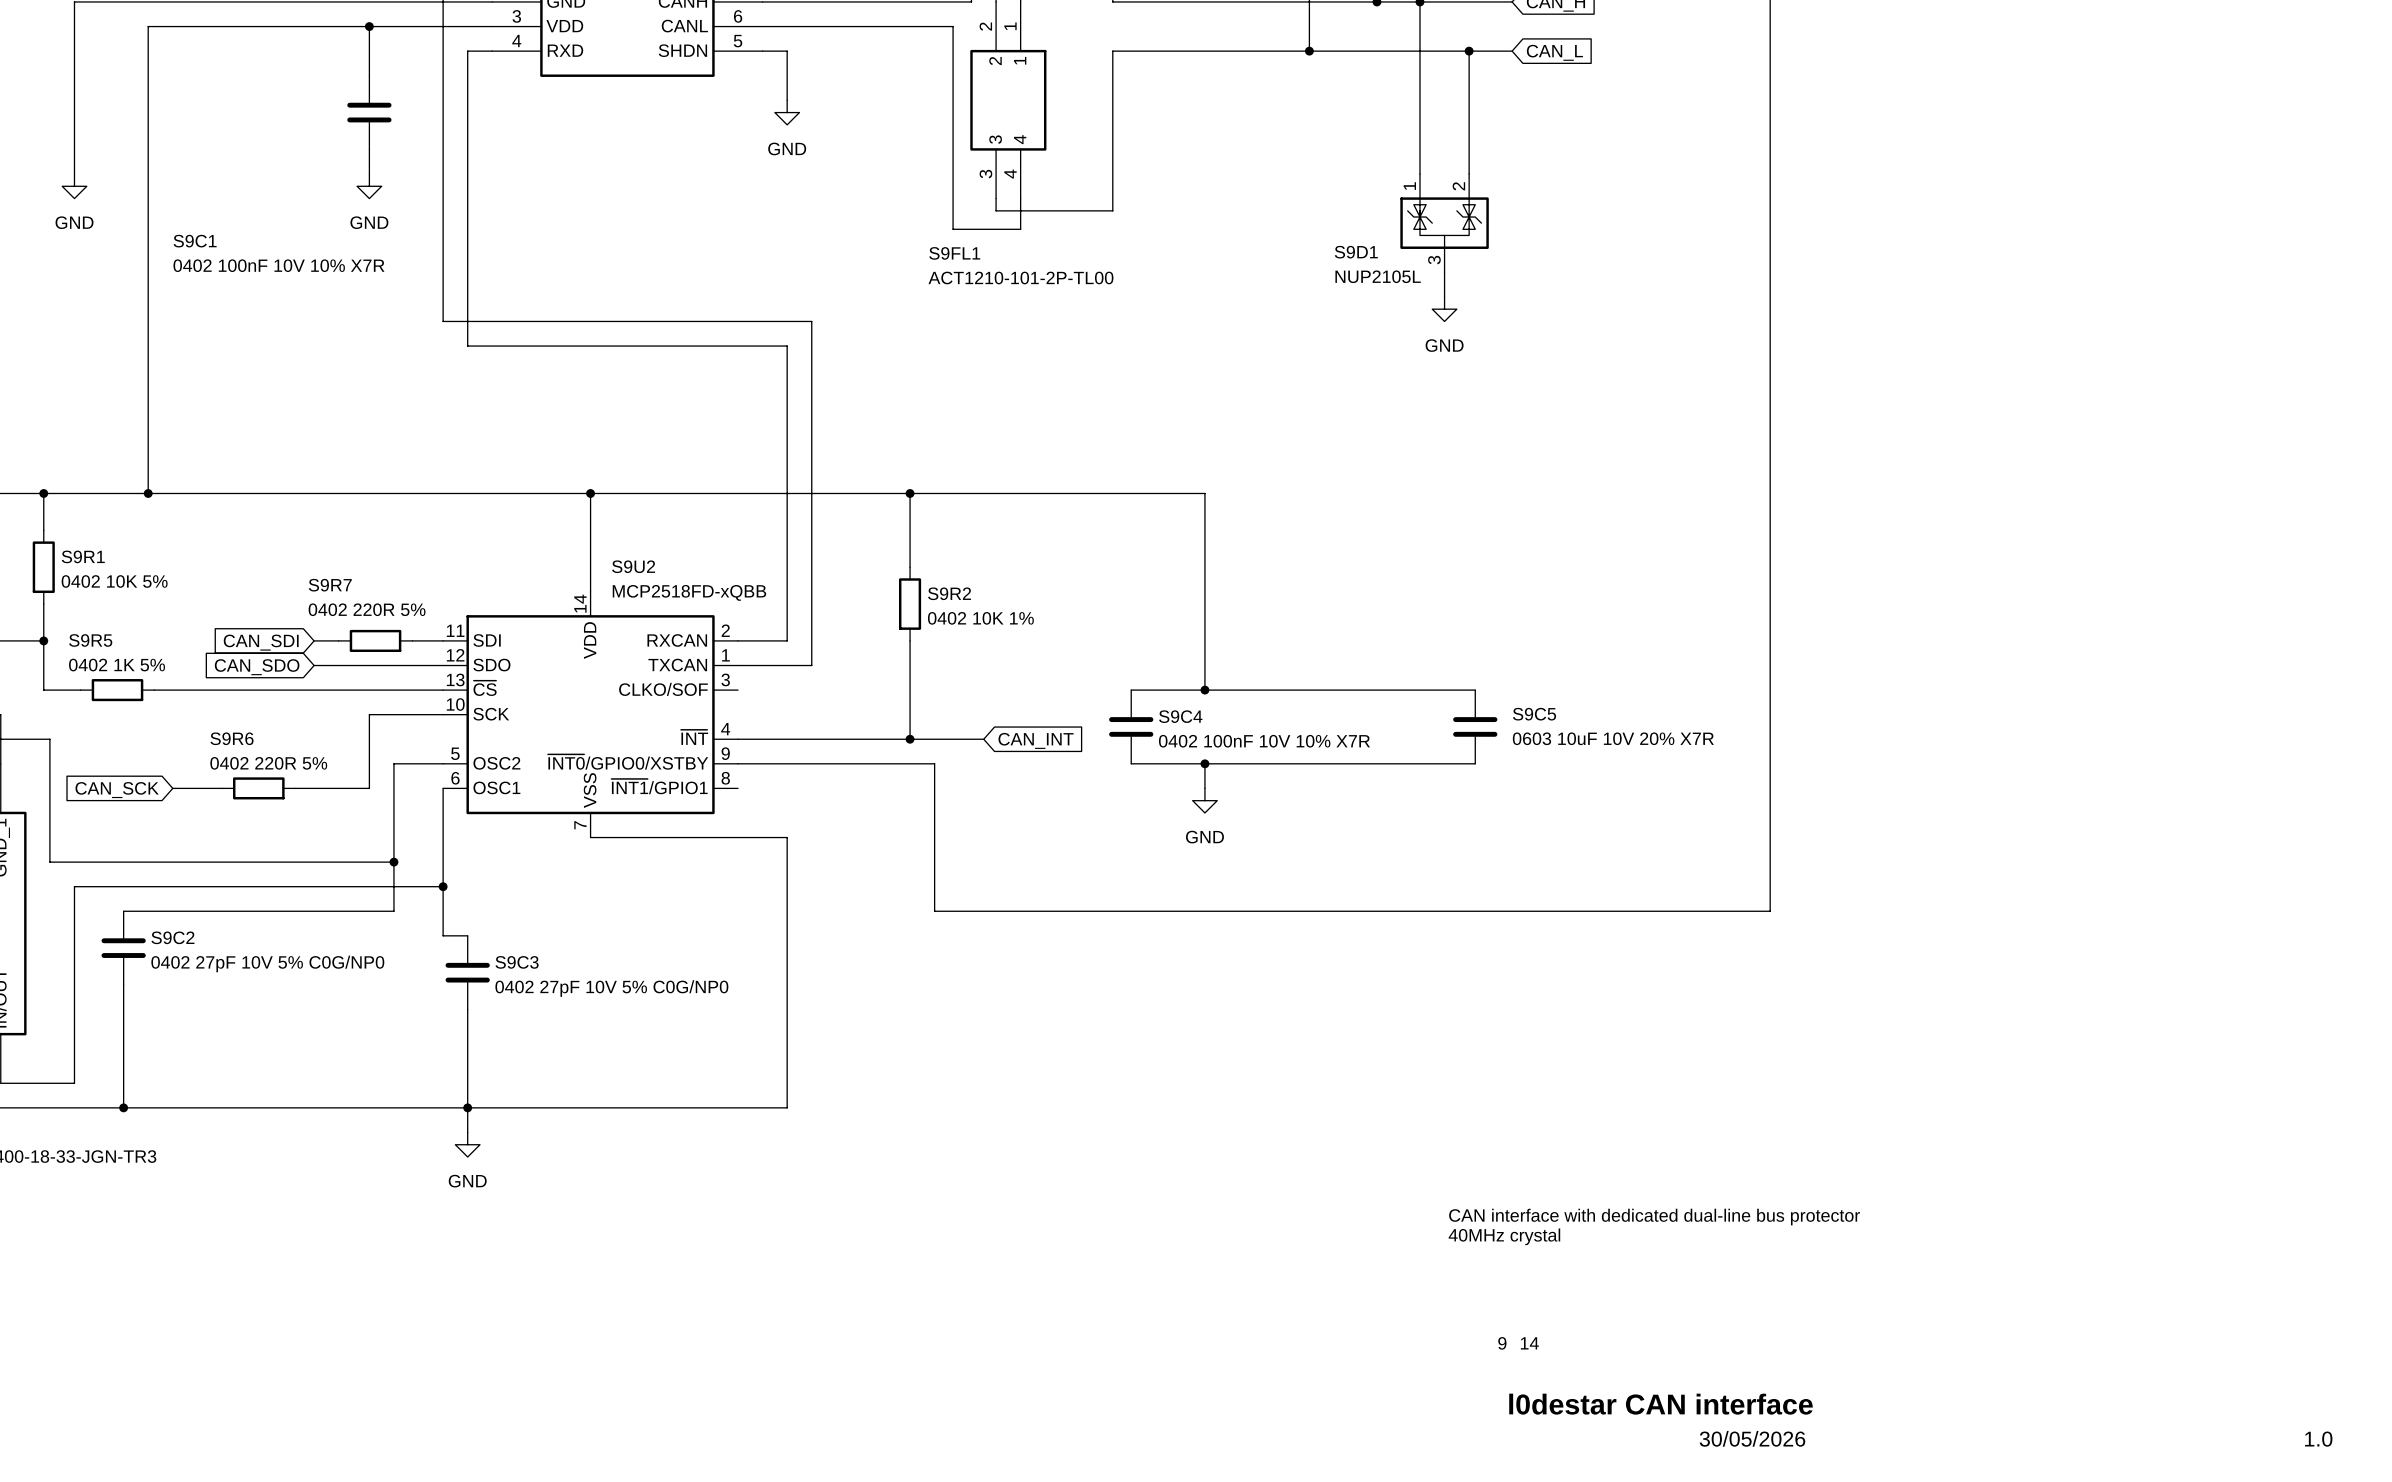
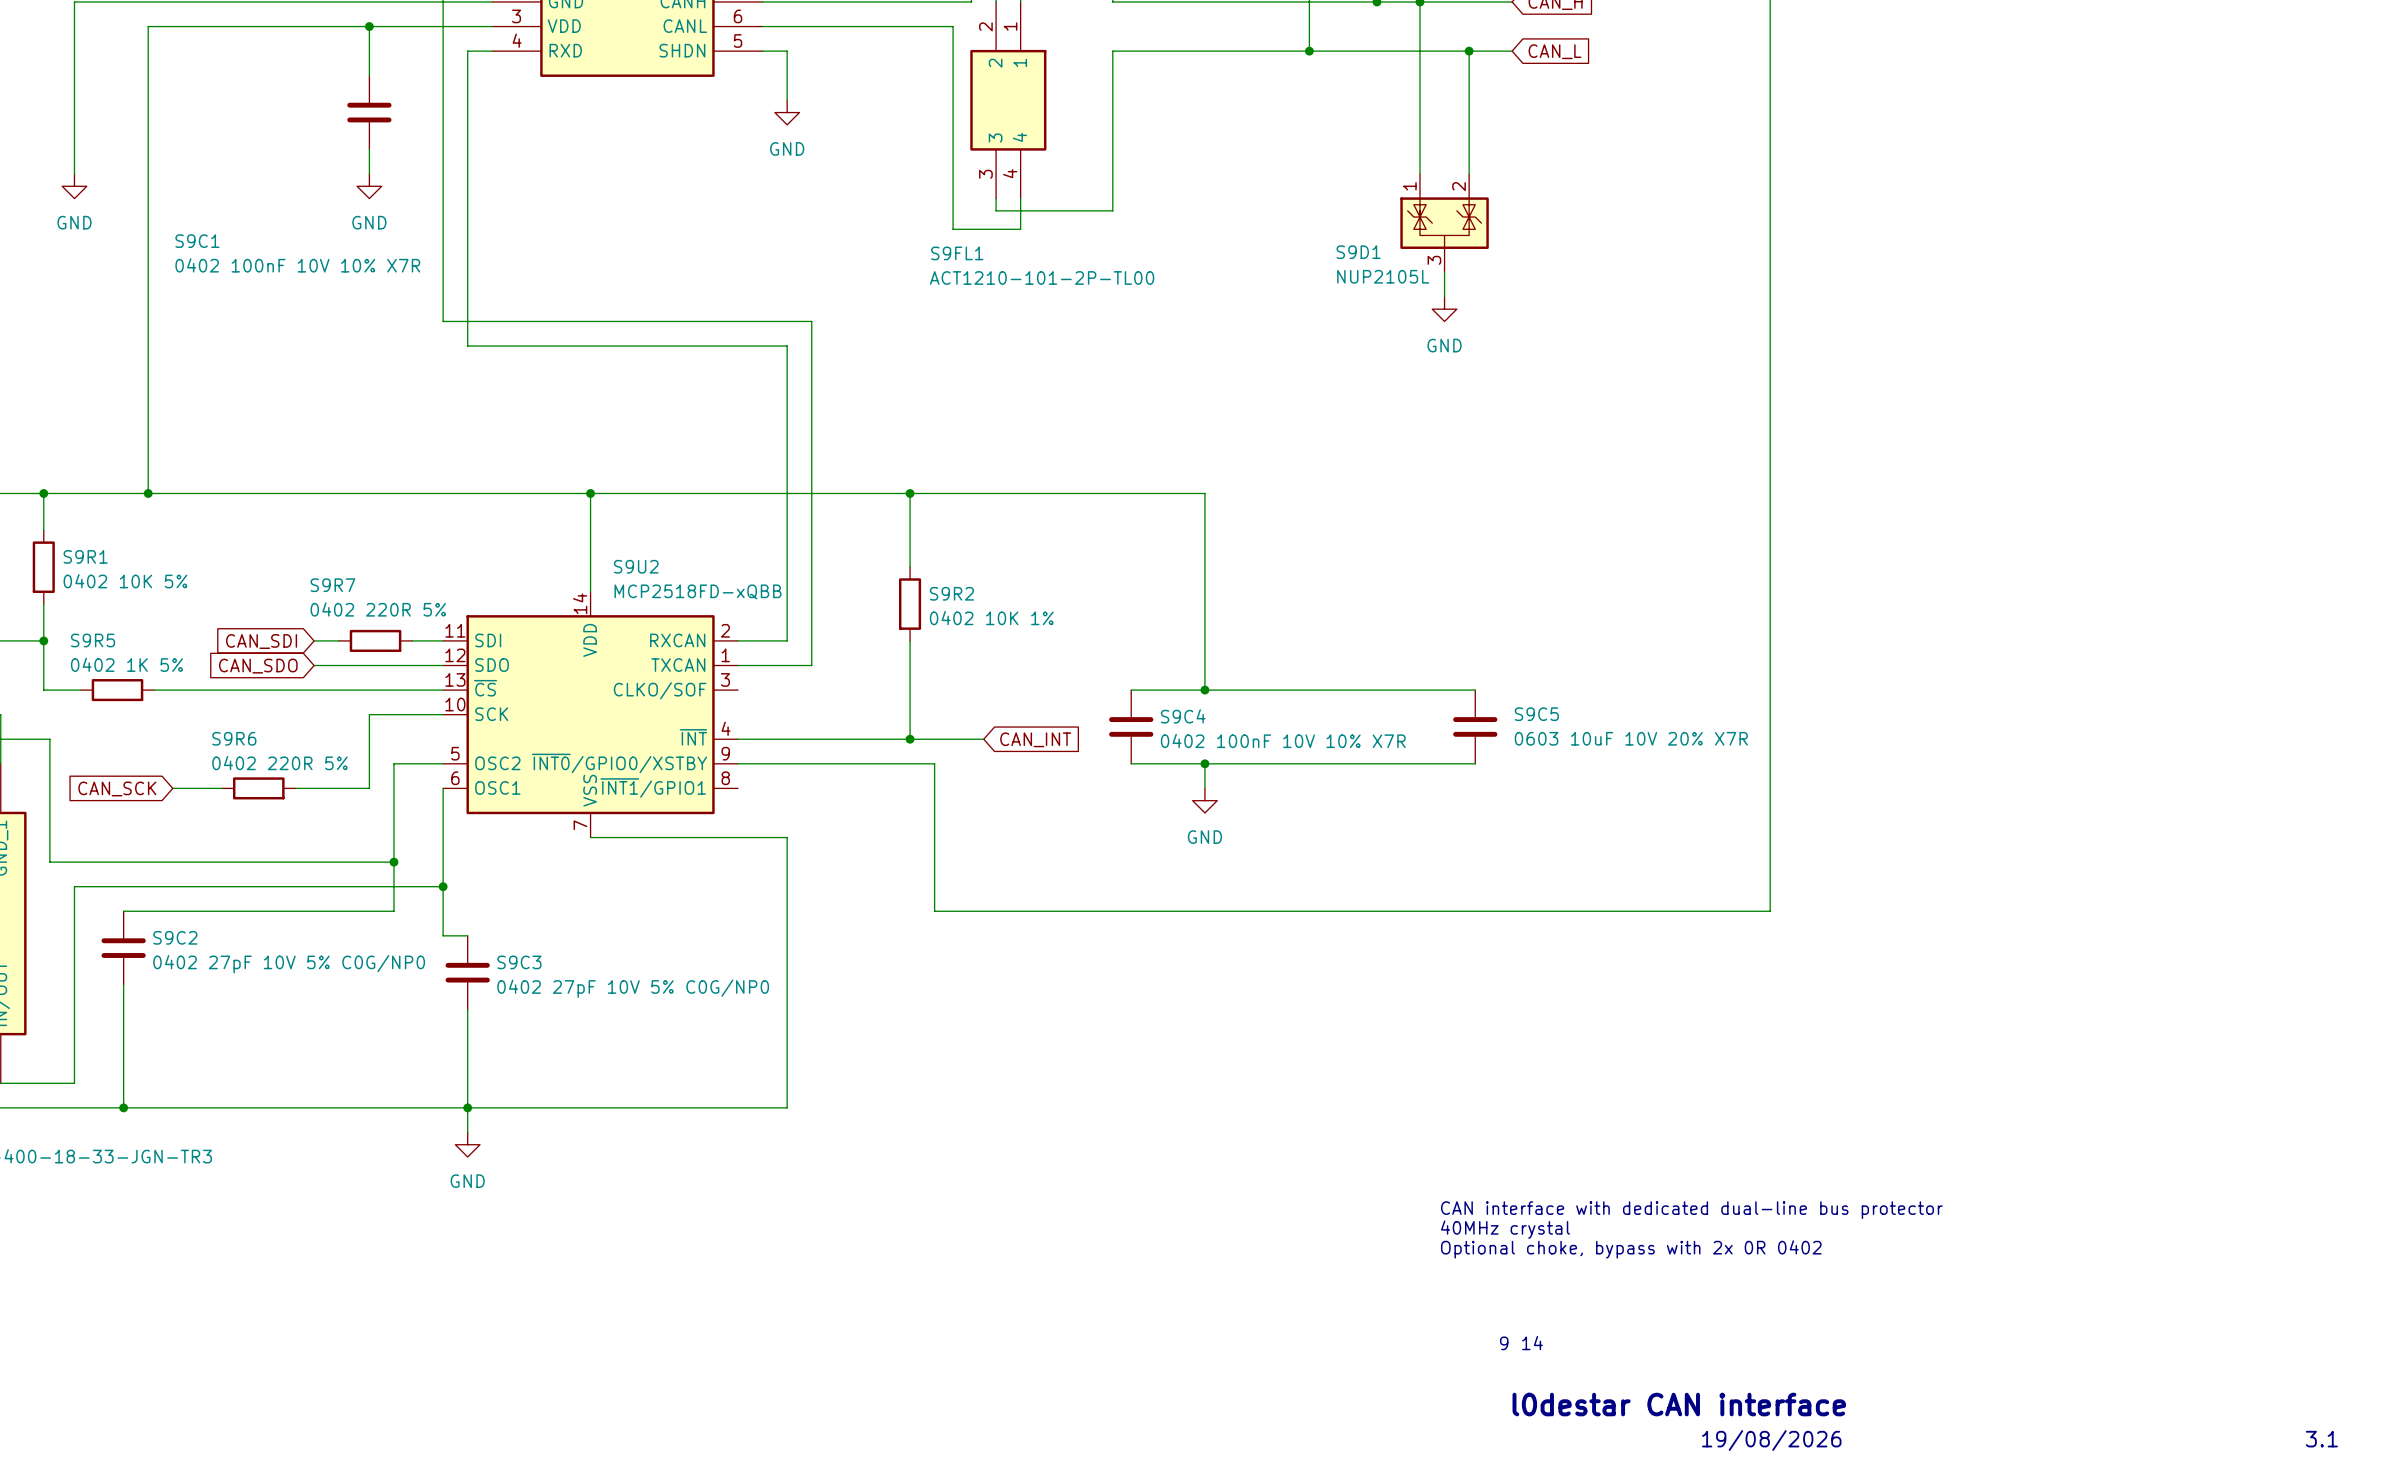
text position: CAN interface with dedicated dual-line bus protector (1654, 1217) -> CAN interface with dedicated dual-line bus protector (1691, 1210)
text position: 40MHz crystal (1504, 1236) -> 40MHz crystal (1505, 1229)
text: none -> Optional choke, bypass with 2x 0R 0402 (1631, 1249)
text: 30/05/2026 (1752, 1438) -> 19/08/2026 (1771, 1440)
text: 1.0 (2318, 1439) -> 3.1 (2321, 1439)

